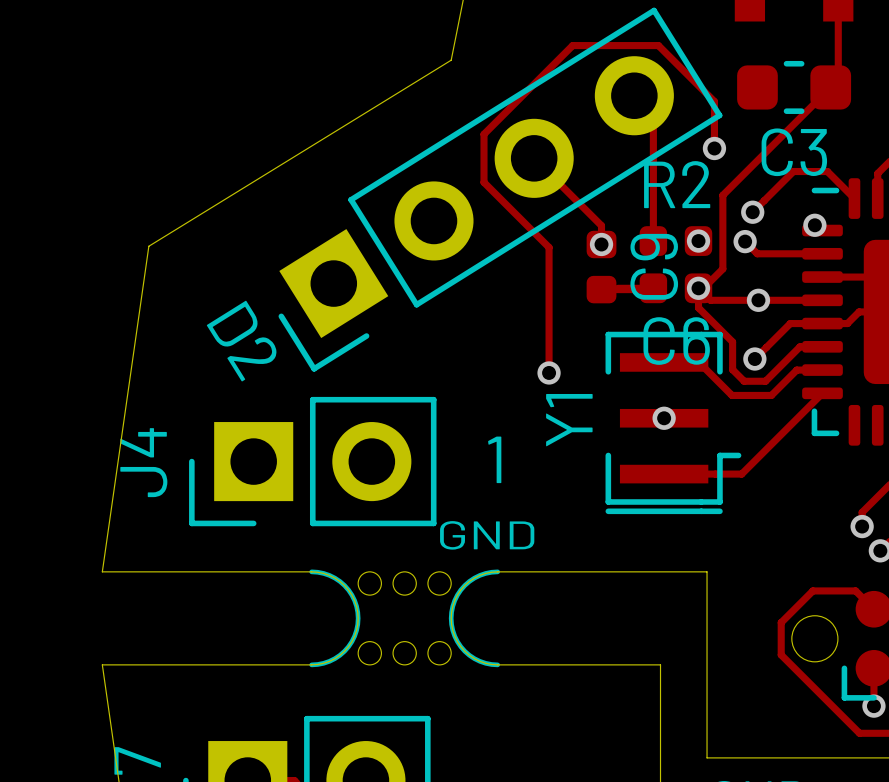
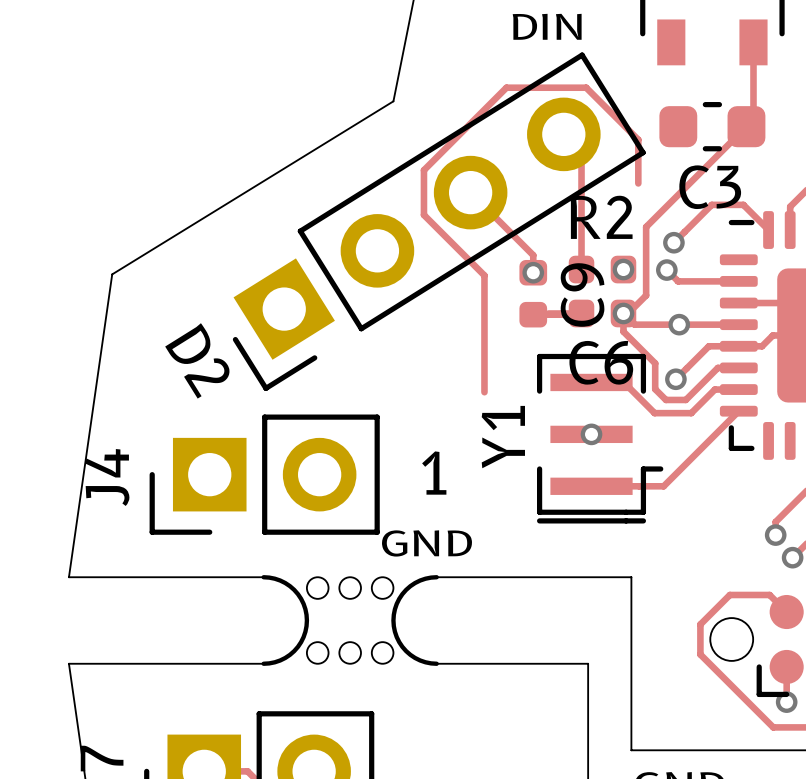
via: (714, 148) -> none
via: (814, 225) -> none
via: (549, 372) -> none

